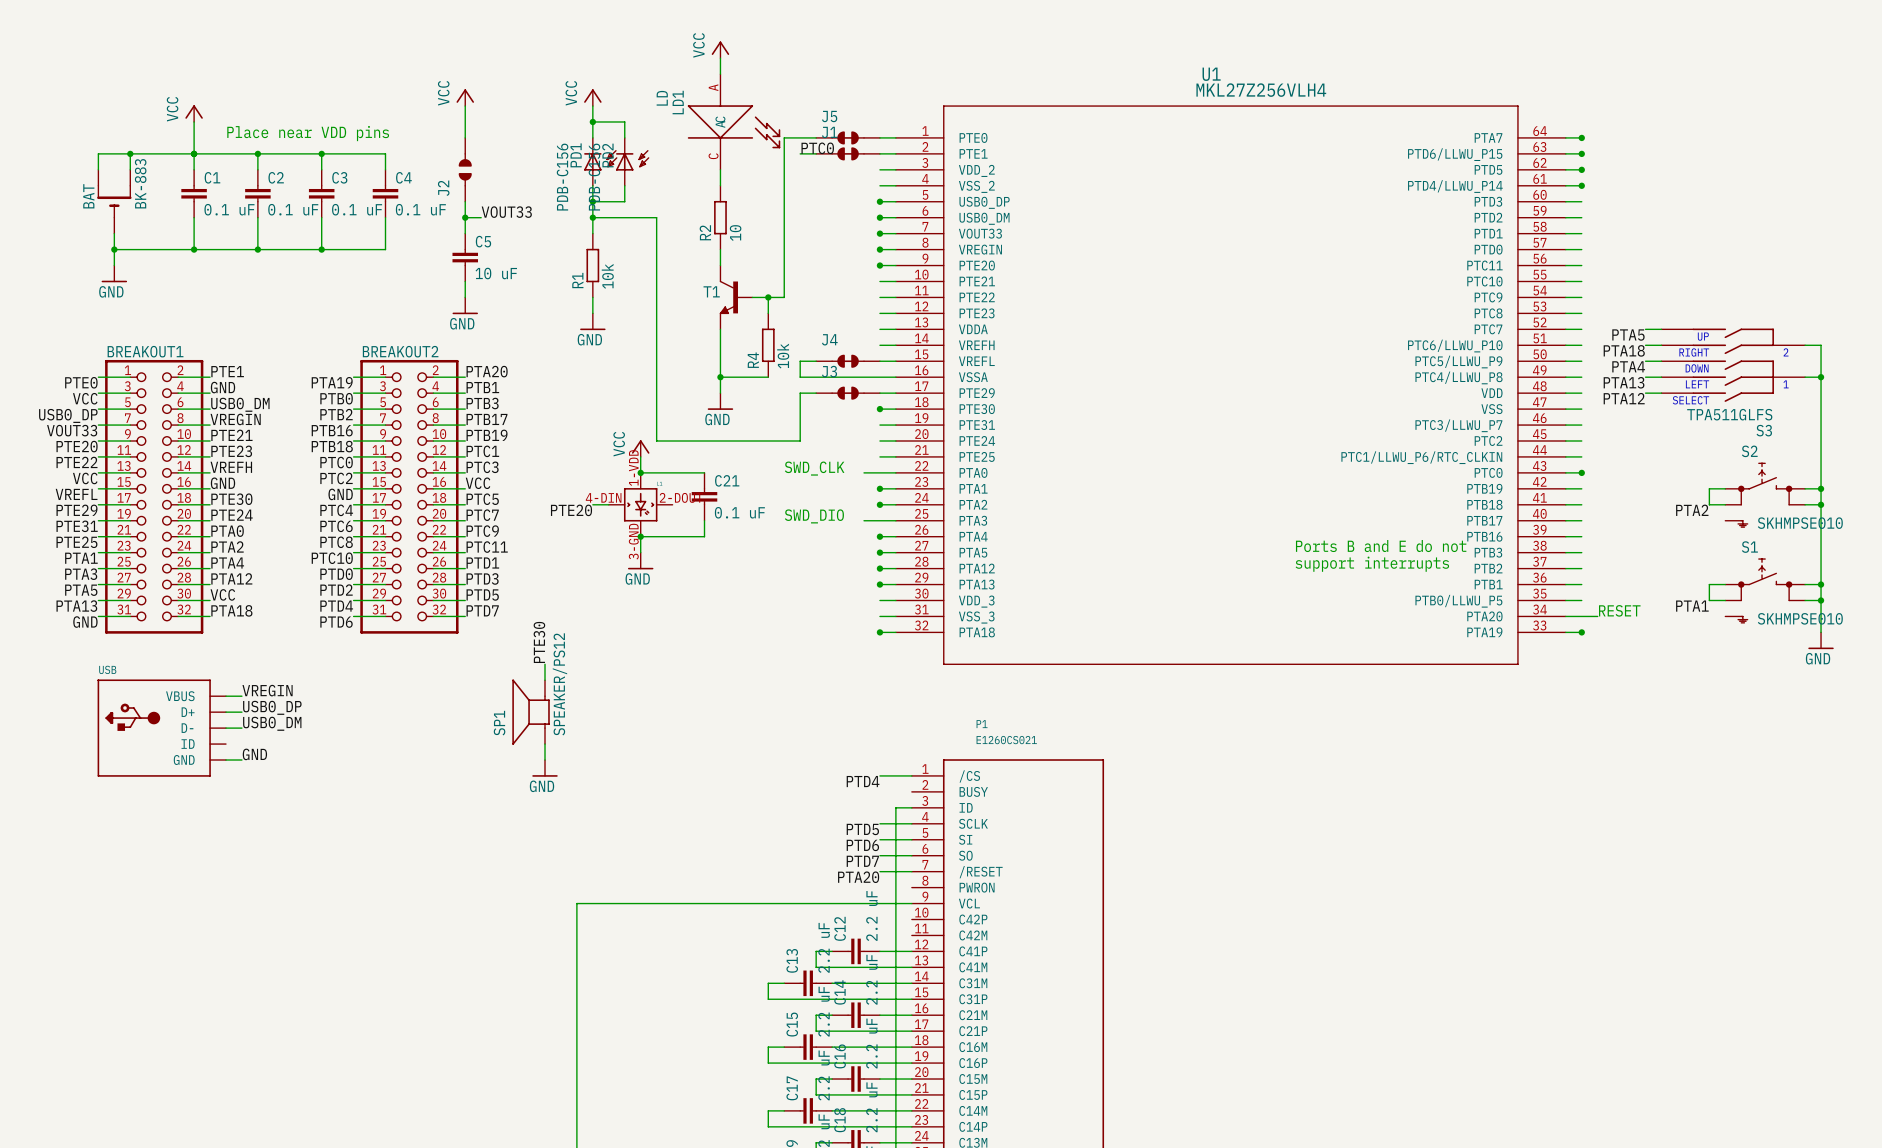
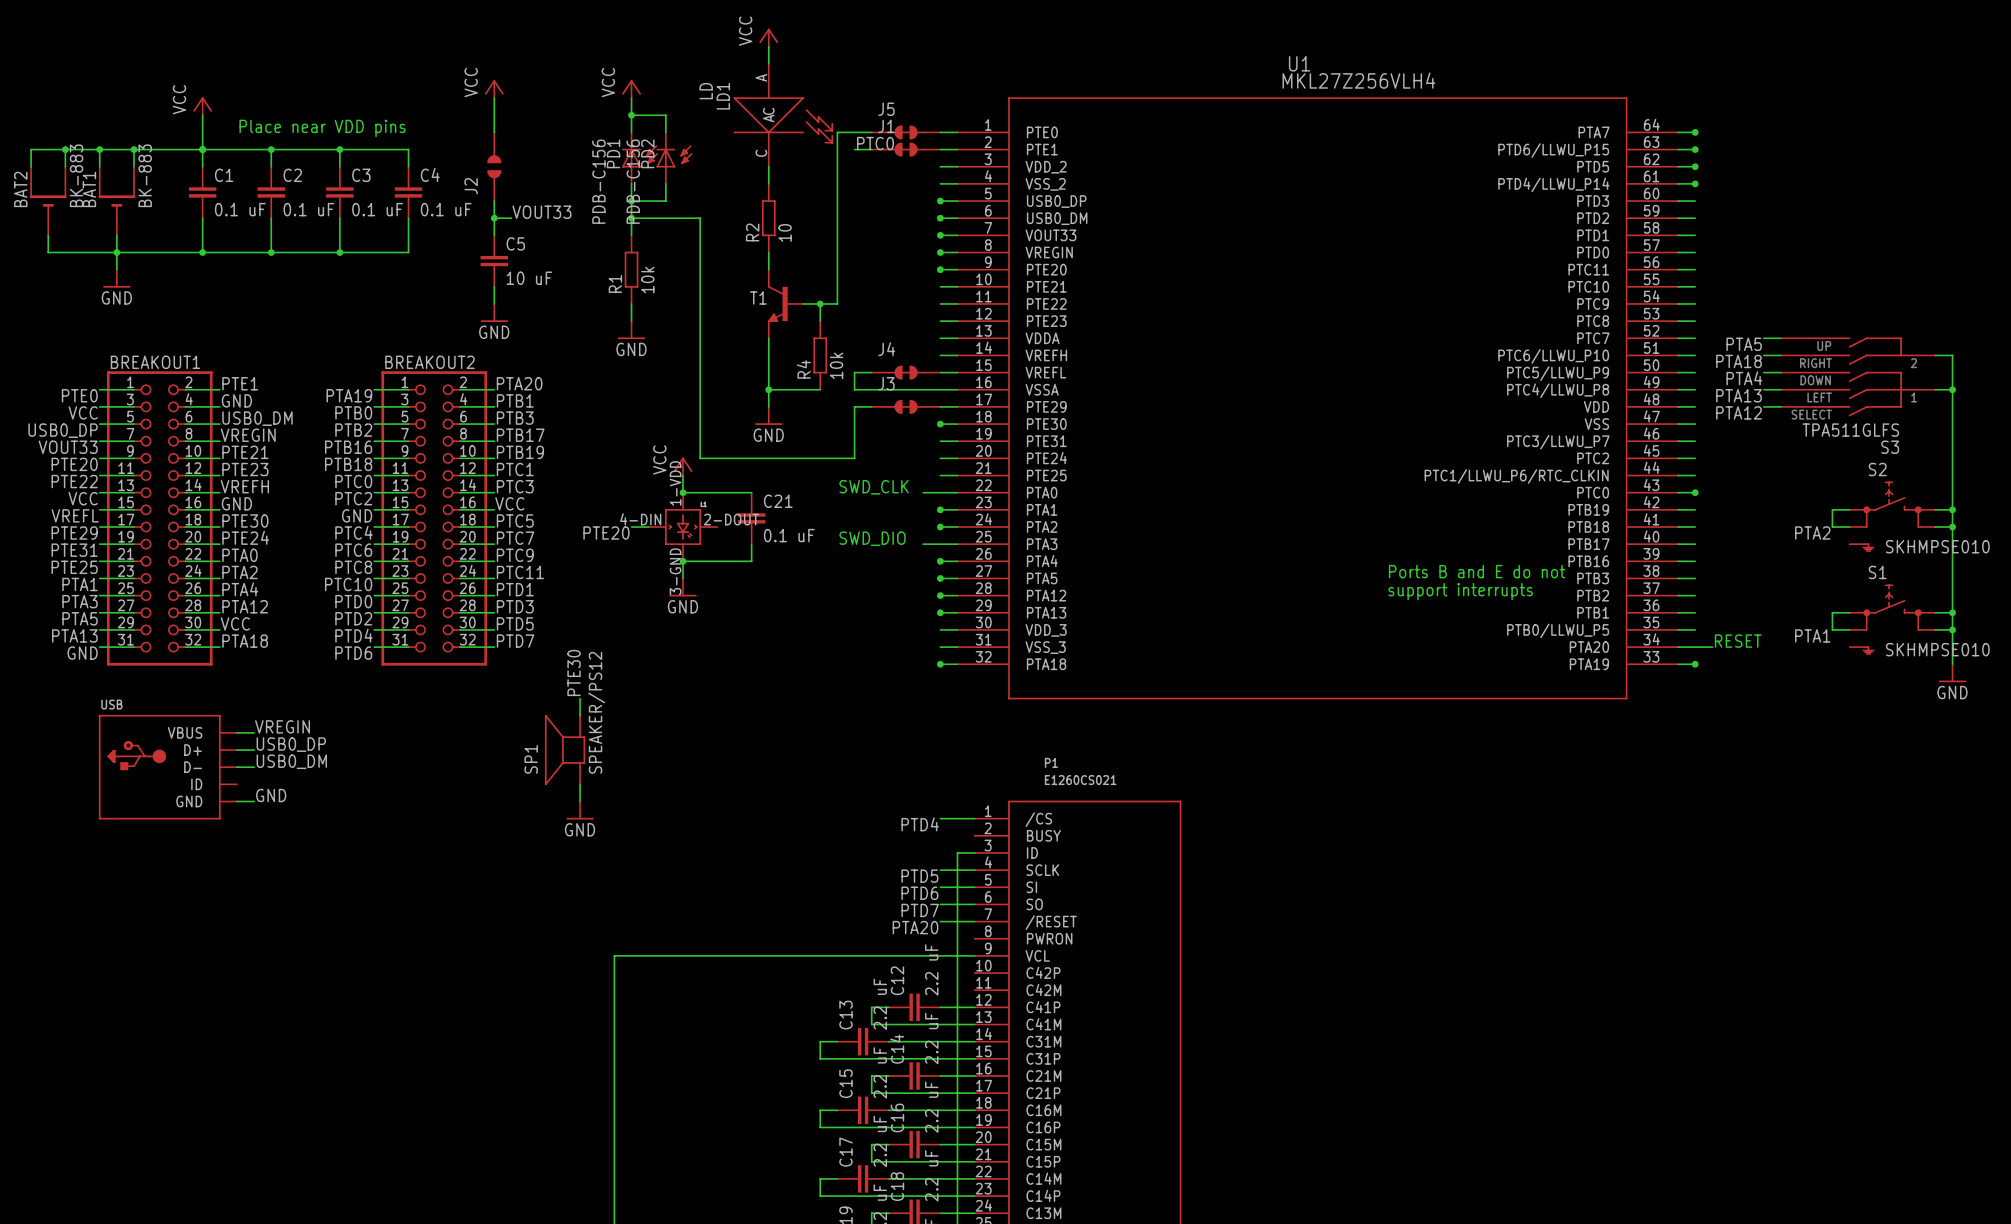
wire: none -> (65, 149) (65, 166)
junction: none -> (65, 149)
wire: none -> (99, 149) (31, 149) (31, 166)
junction: none -> (99, 149)
BAT name: BAT (88, 196) -> BAT1 (89, 189)
BAT2: none -> BK-883 (48, 201)
wire: none -> (48, 235) (48, 252) (116, 252)

